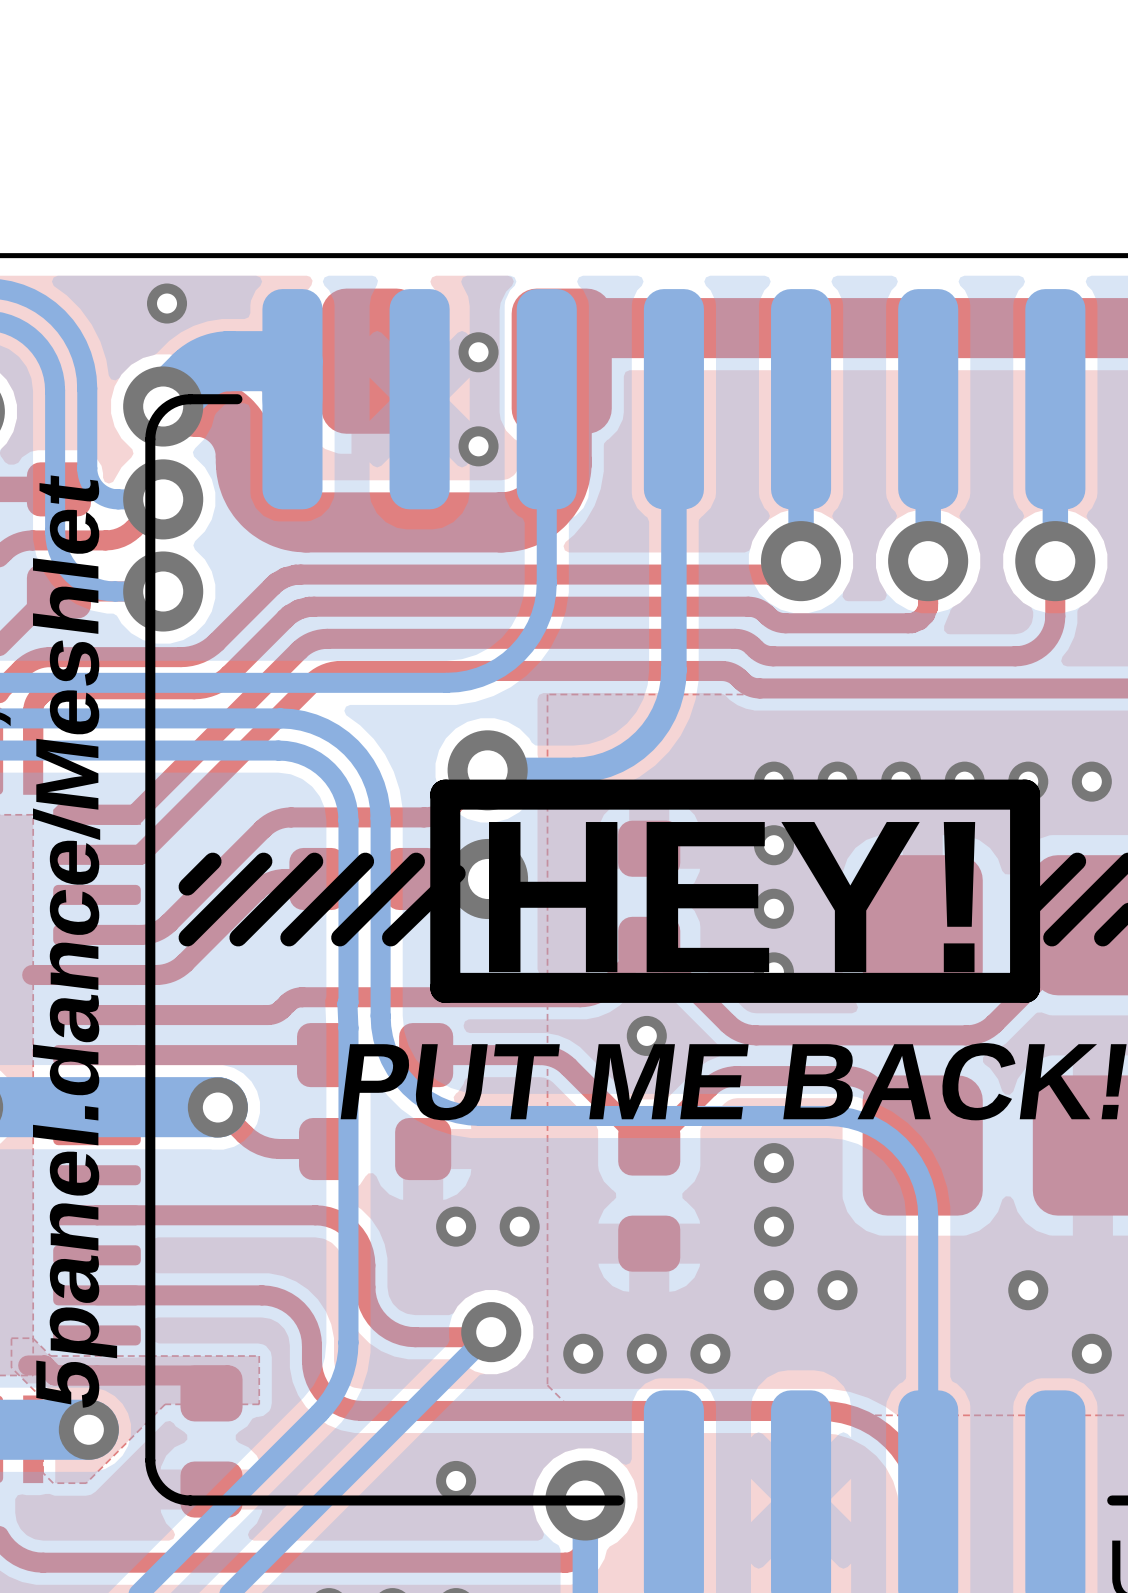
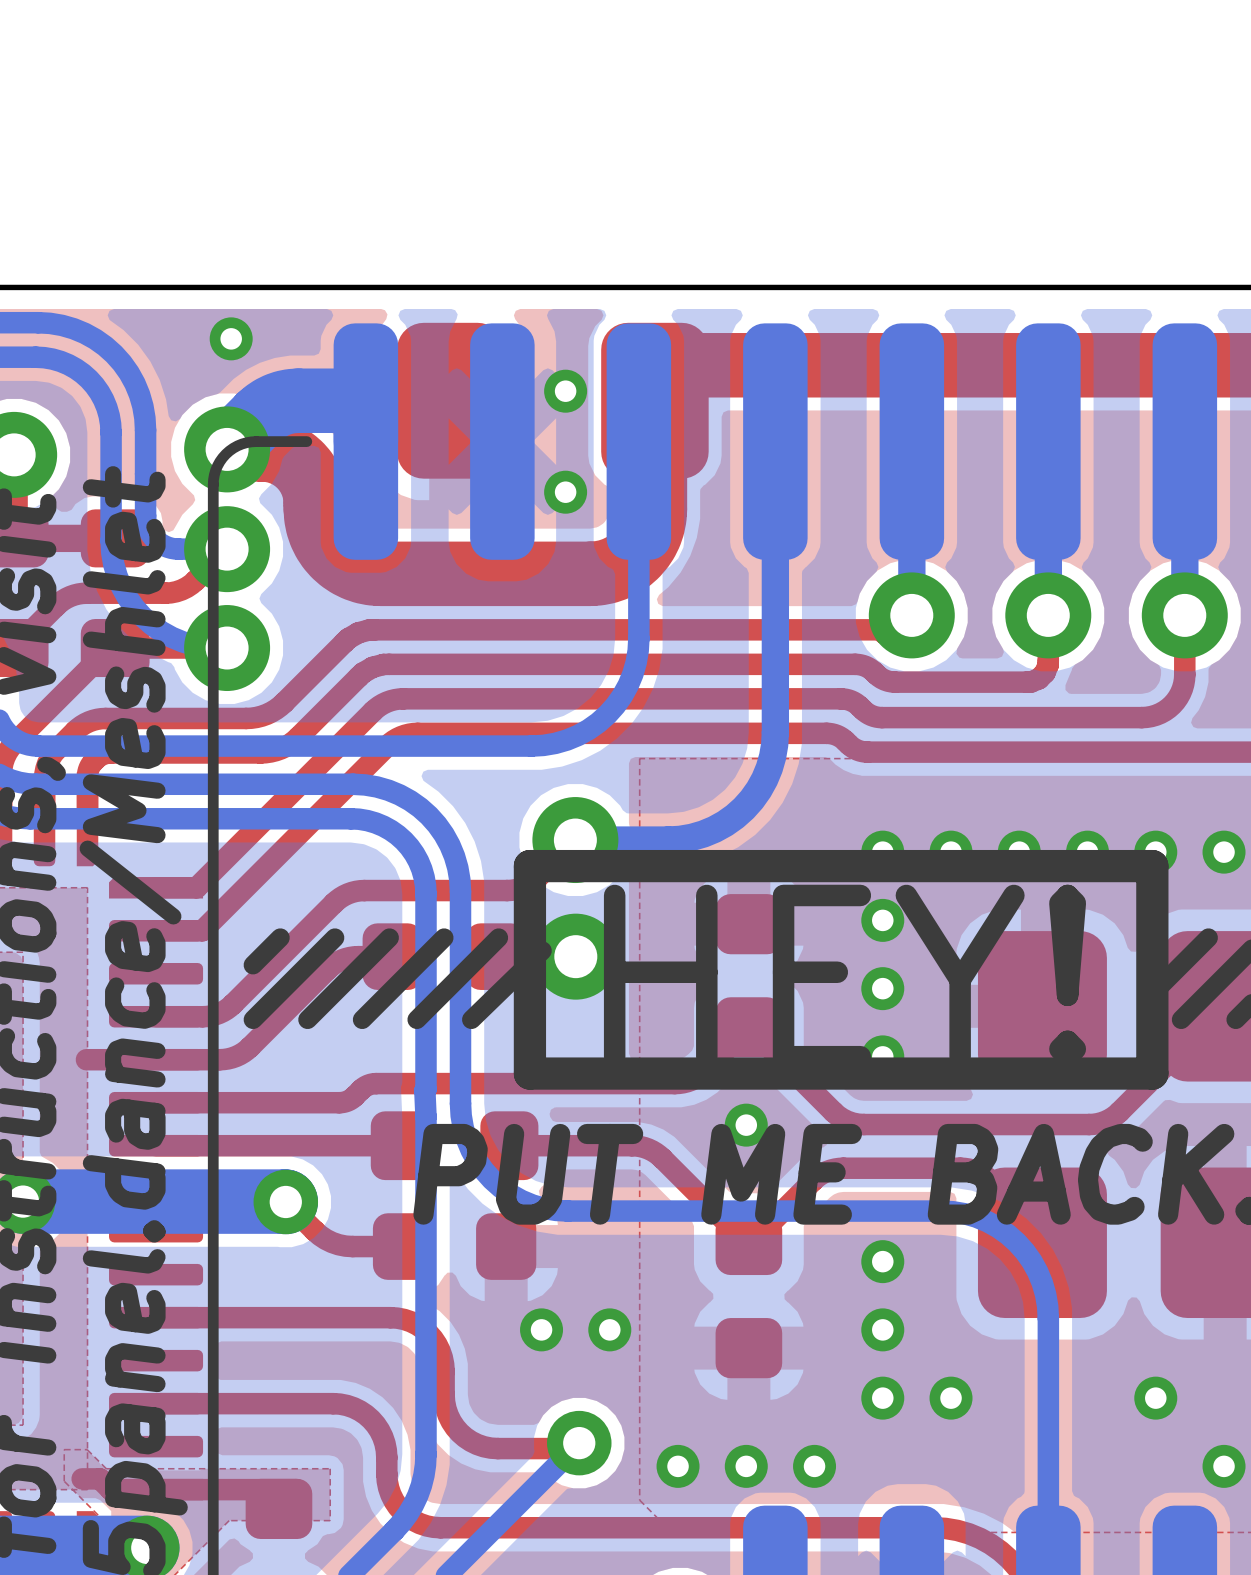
bottom track: (55, 491) (56, 544) (64, 563) (72, 573) (83, 582) (101, 589) (155, 591) -> (111, 540) (117, 576) (127, 597) (142, 616) (161, 631) (183, 641) (218, 648)

